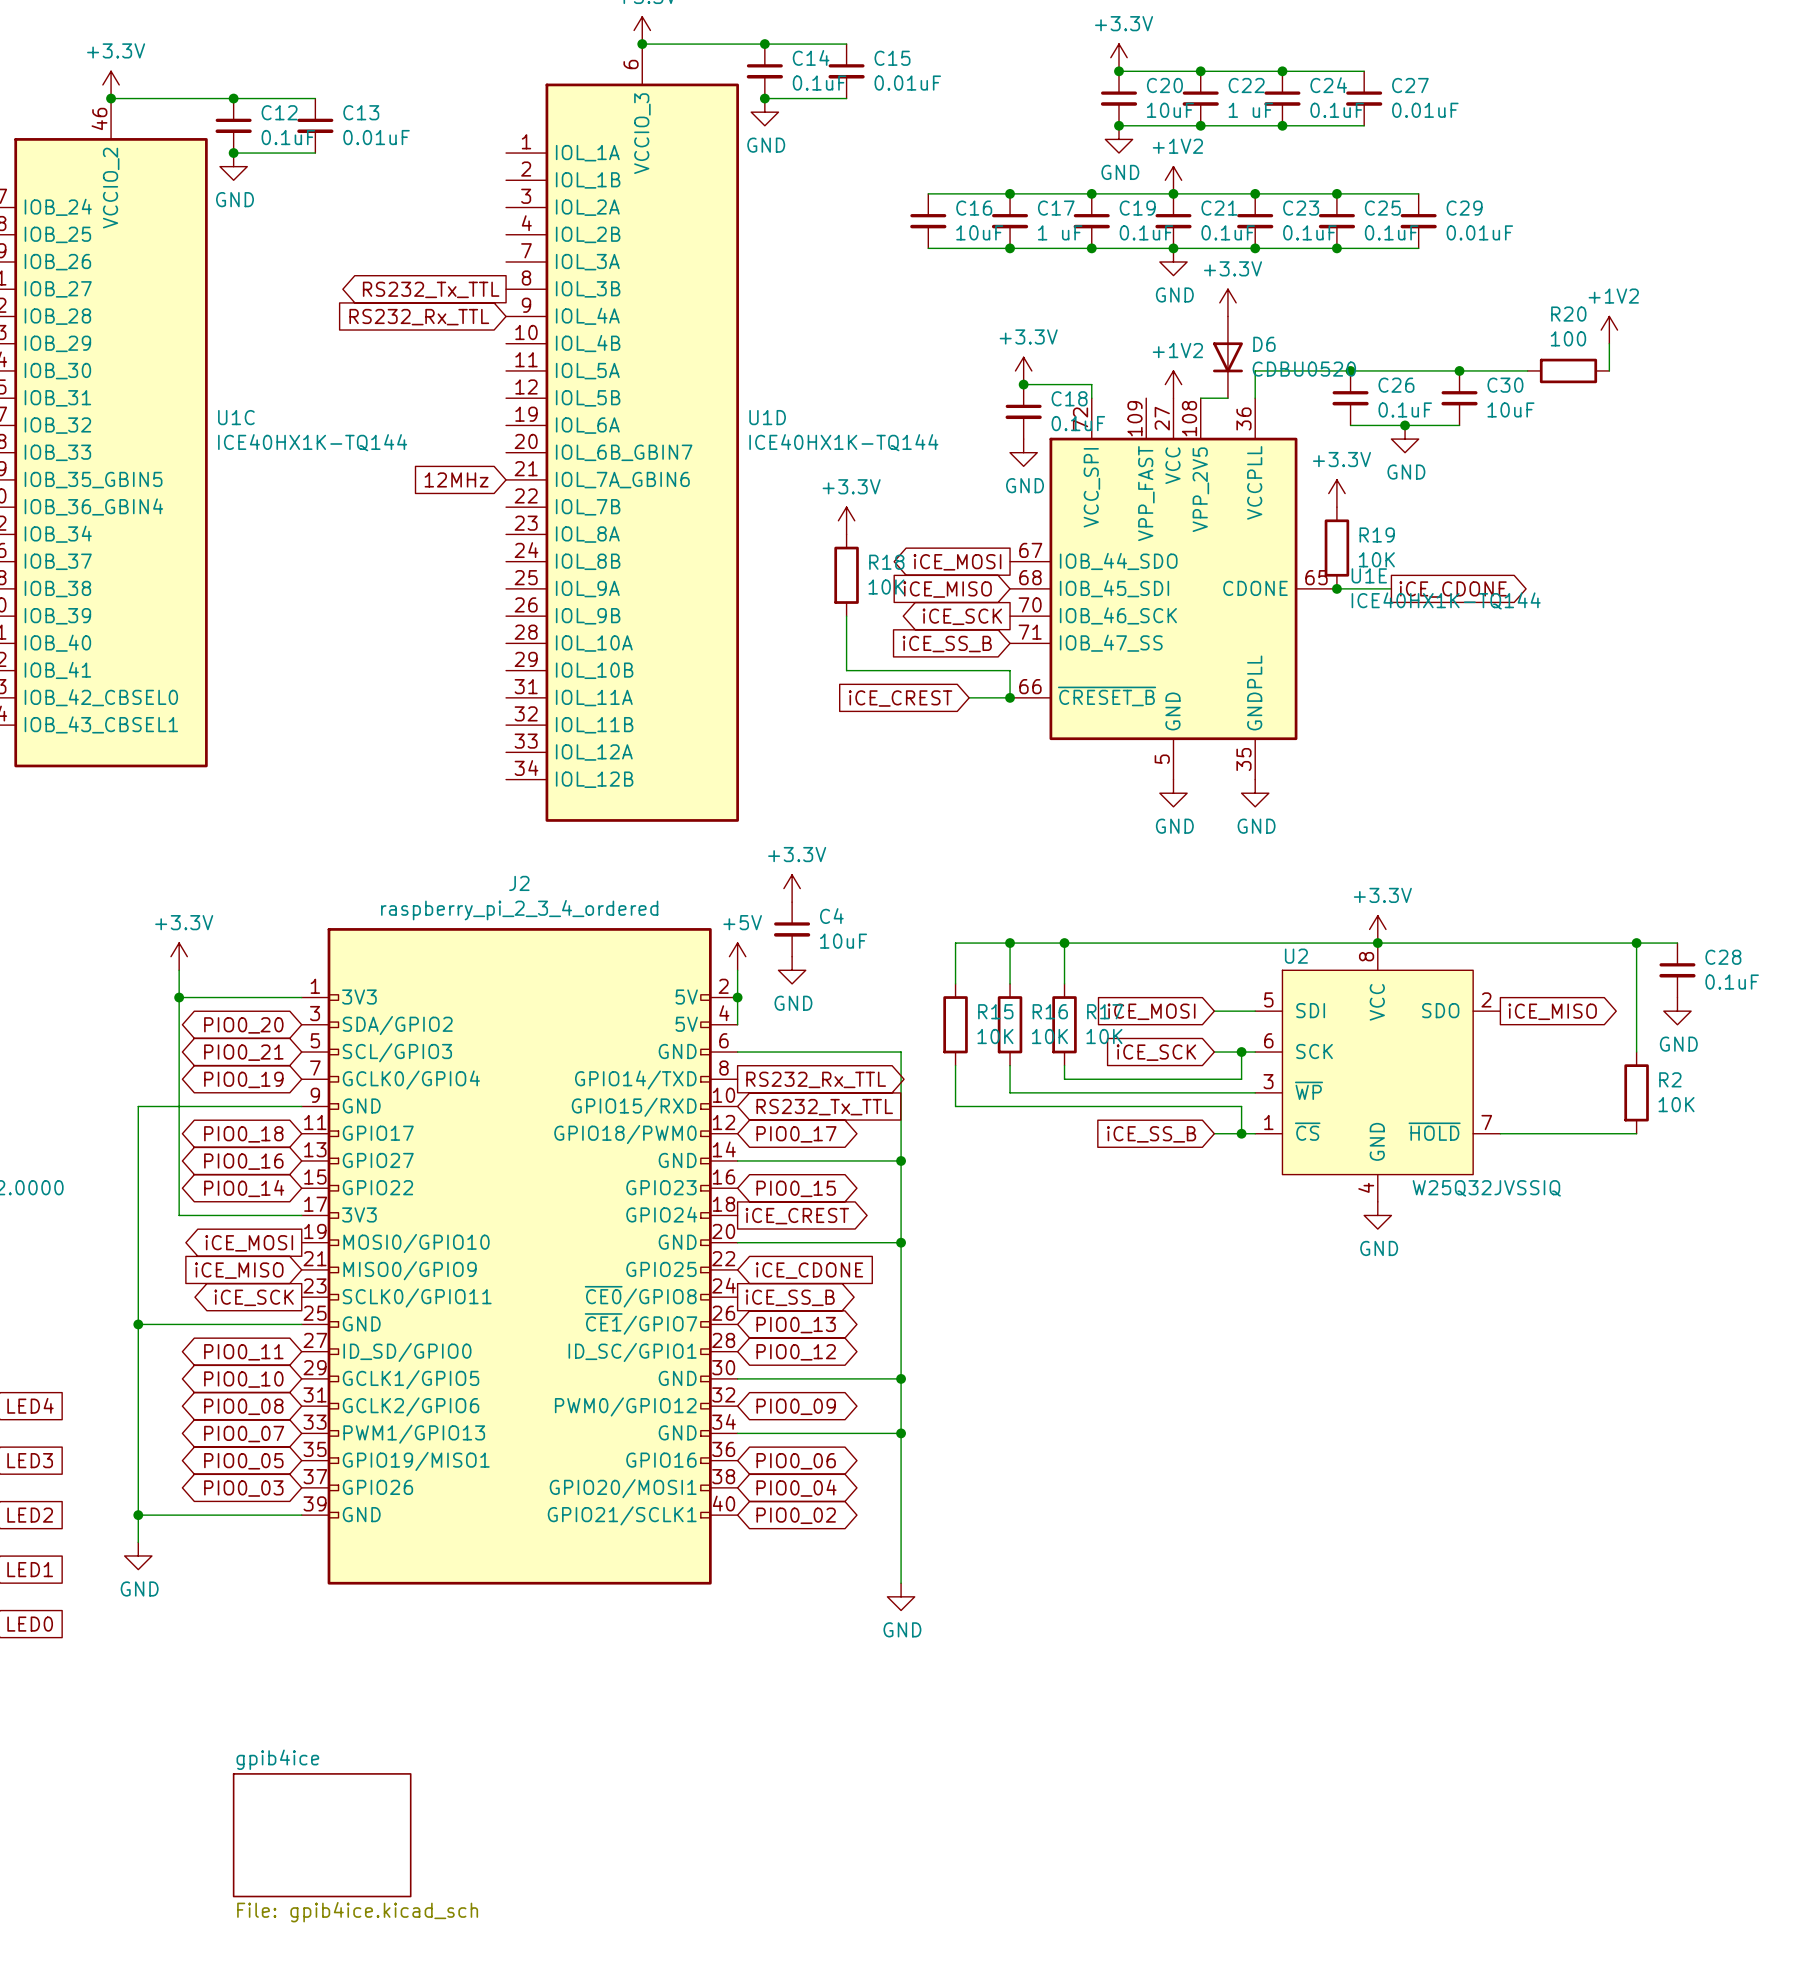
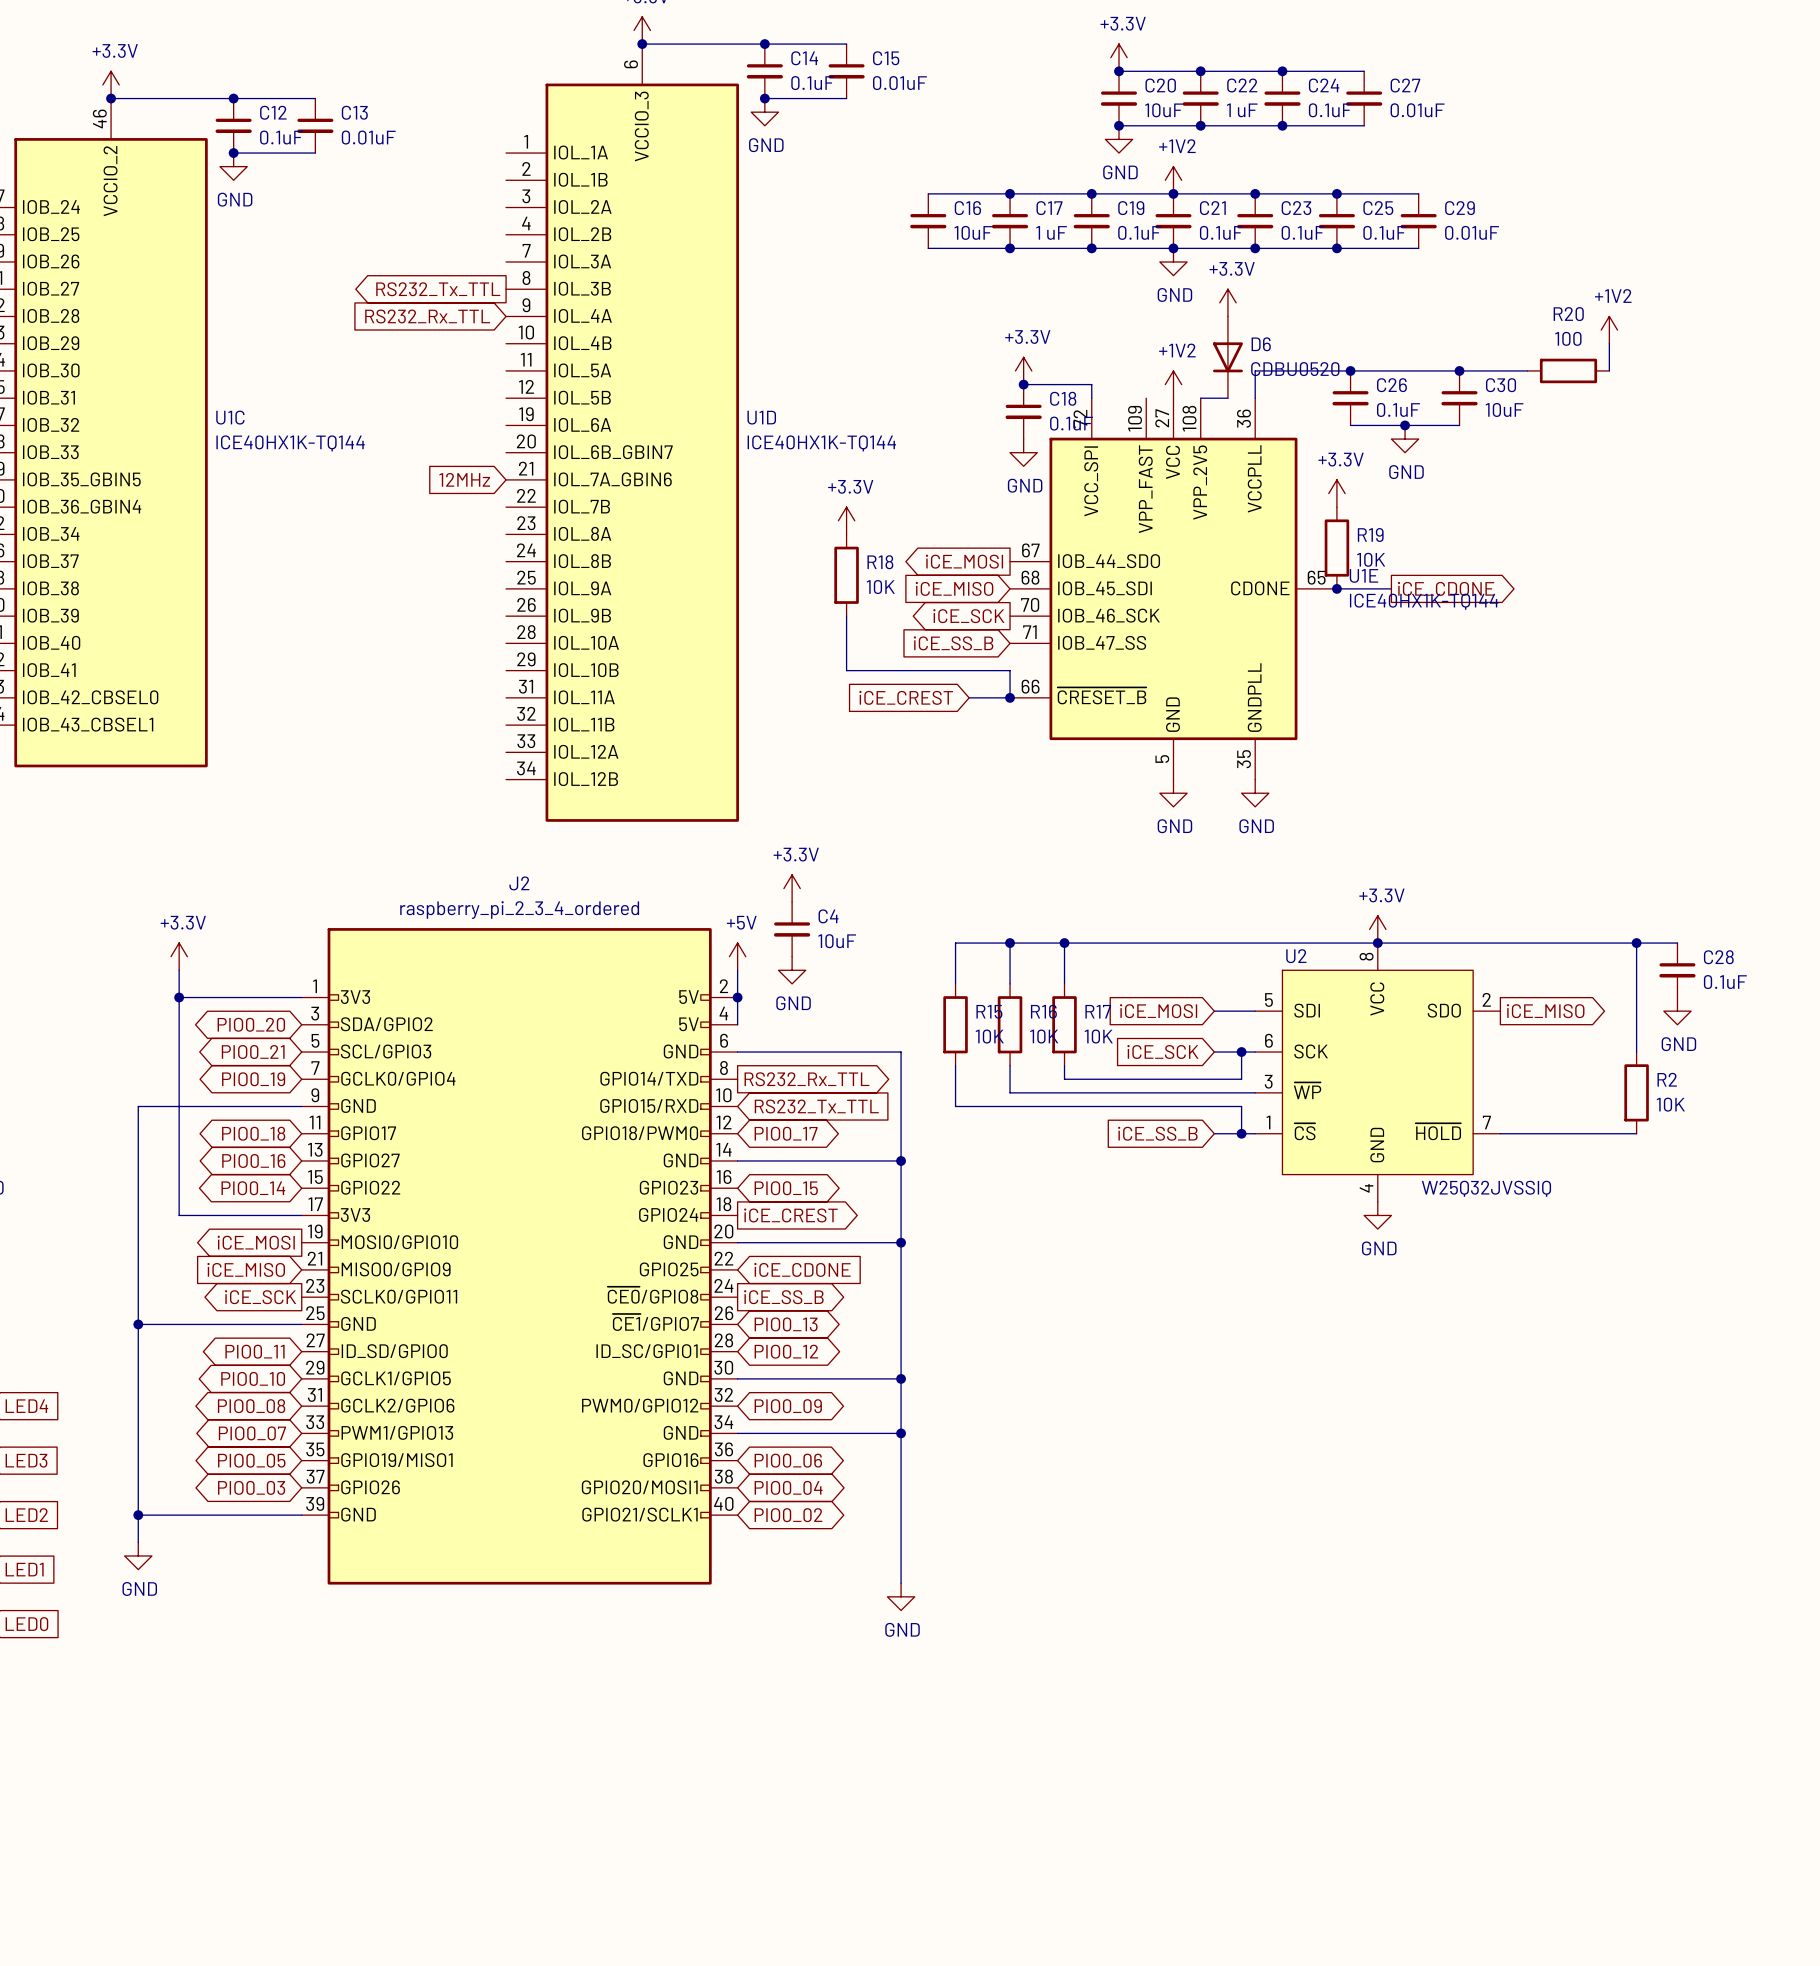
sheet gpib4ice: File: gpib4ice.kicad_sch (322, 1835) -> none

